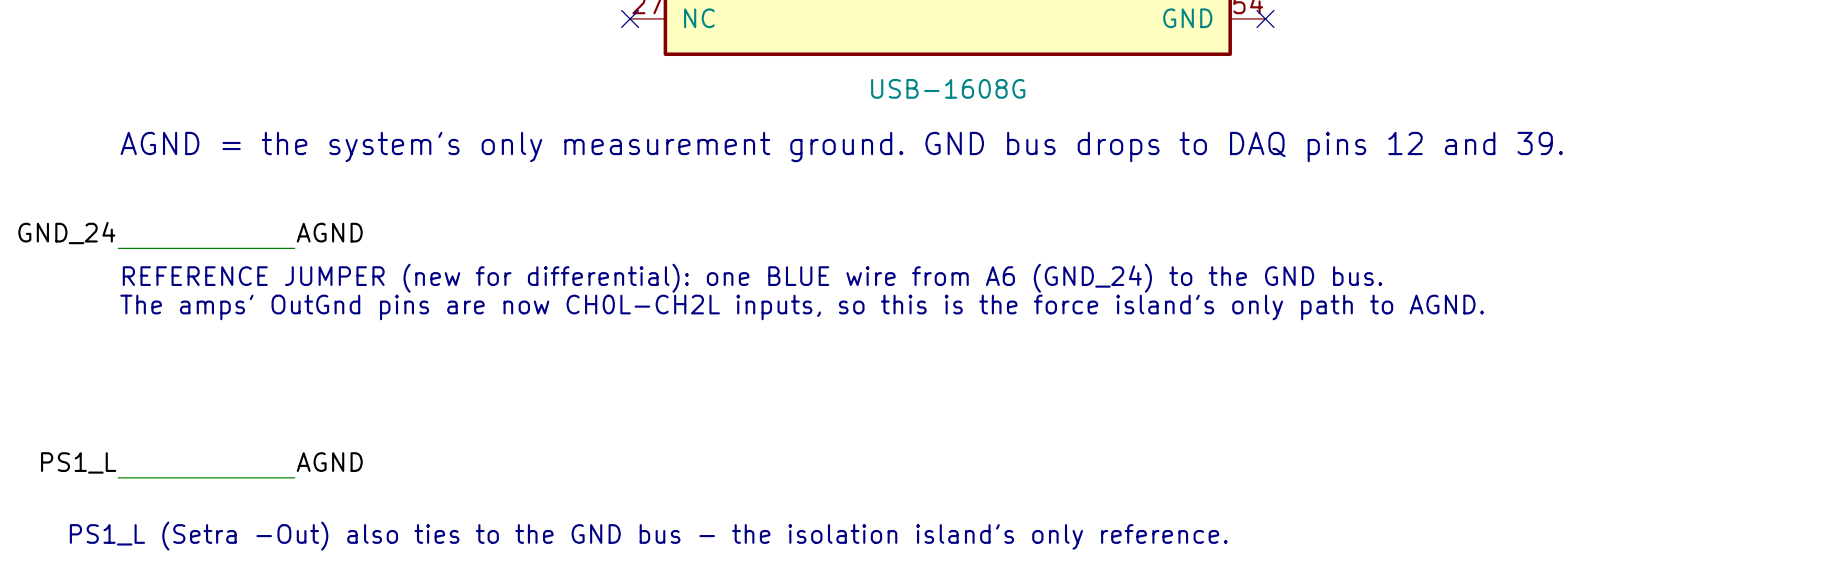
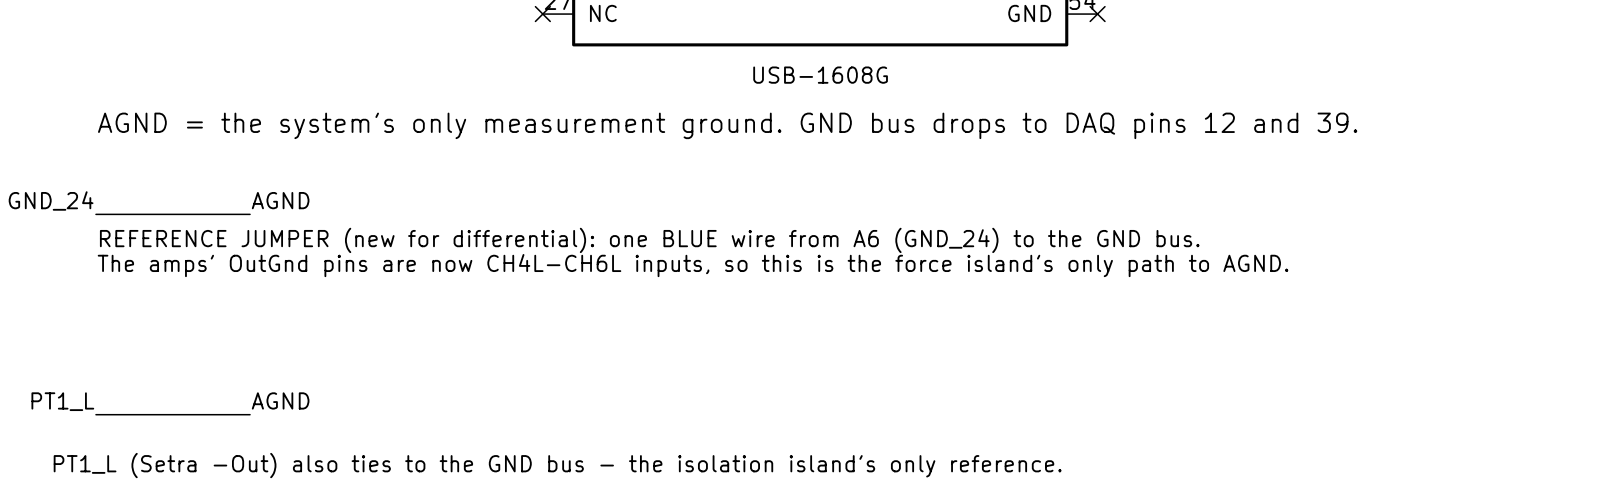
text: The amps' OutGnd pins are now CH0L-CH2L inputs, so this is the force island's only path to AGND. (802, 307) -> The amps' OutGnd pins are now CH4L-CH6L inputs, so this is the force island's only path to AGND. (693, 265)
label: PS1_L (78, 462) -> PT1_L (62, 401)
text: PS1_L (Setra -Out) also ties to the GND bus - the isolation island's only reference. (648, 536) -> PT1_L (Setra -Out) also ties to the GND bus - the isolation island's only reference. (557, 465)

